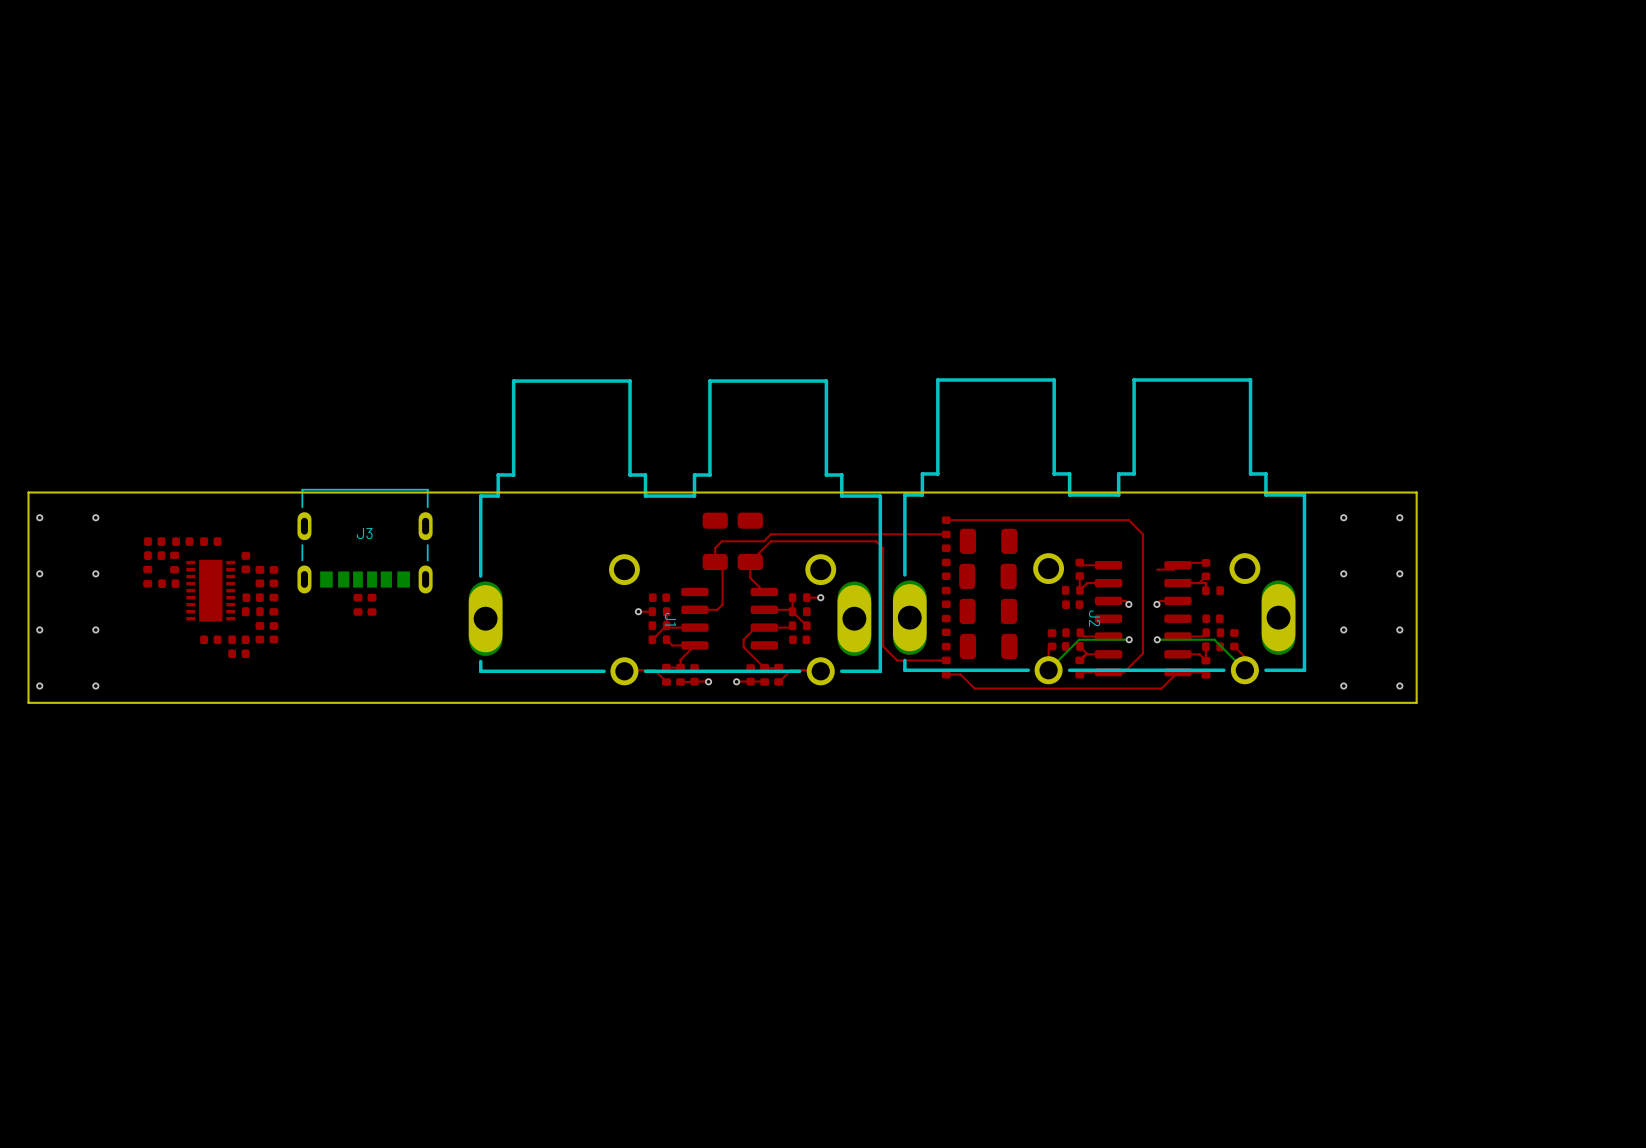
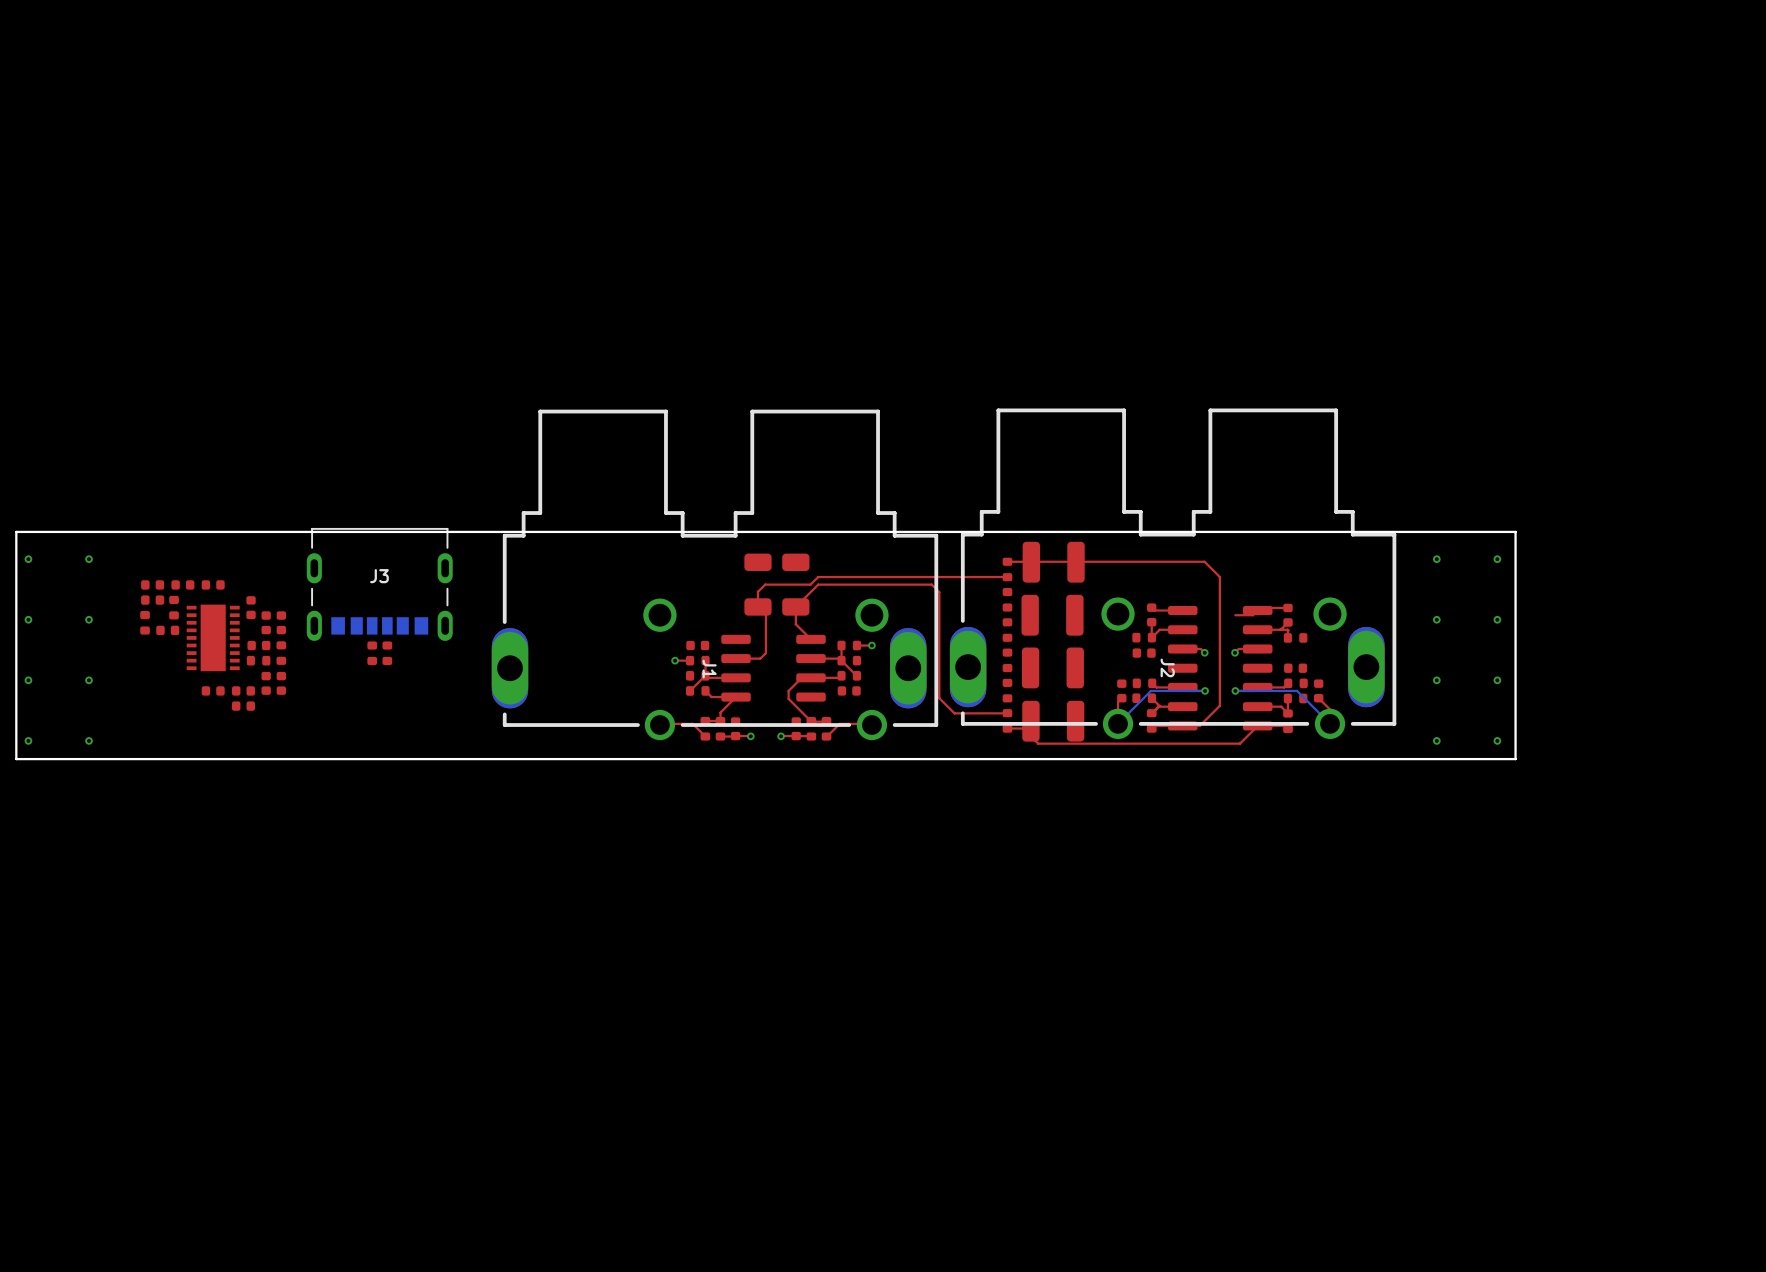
part: none -> (1053, 562)
part: (988, 541) -> none
part footprint: [959, 563, 1017, 589] -> [1021, 594, 1084, 636]
part footprint: [959, 598, 1018, 625] -> [1021, 647, 1084, 689]
part: (988, 646) -> none
part: none -> (1053, 721)

